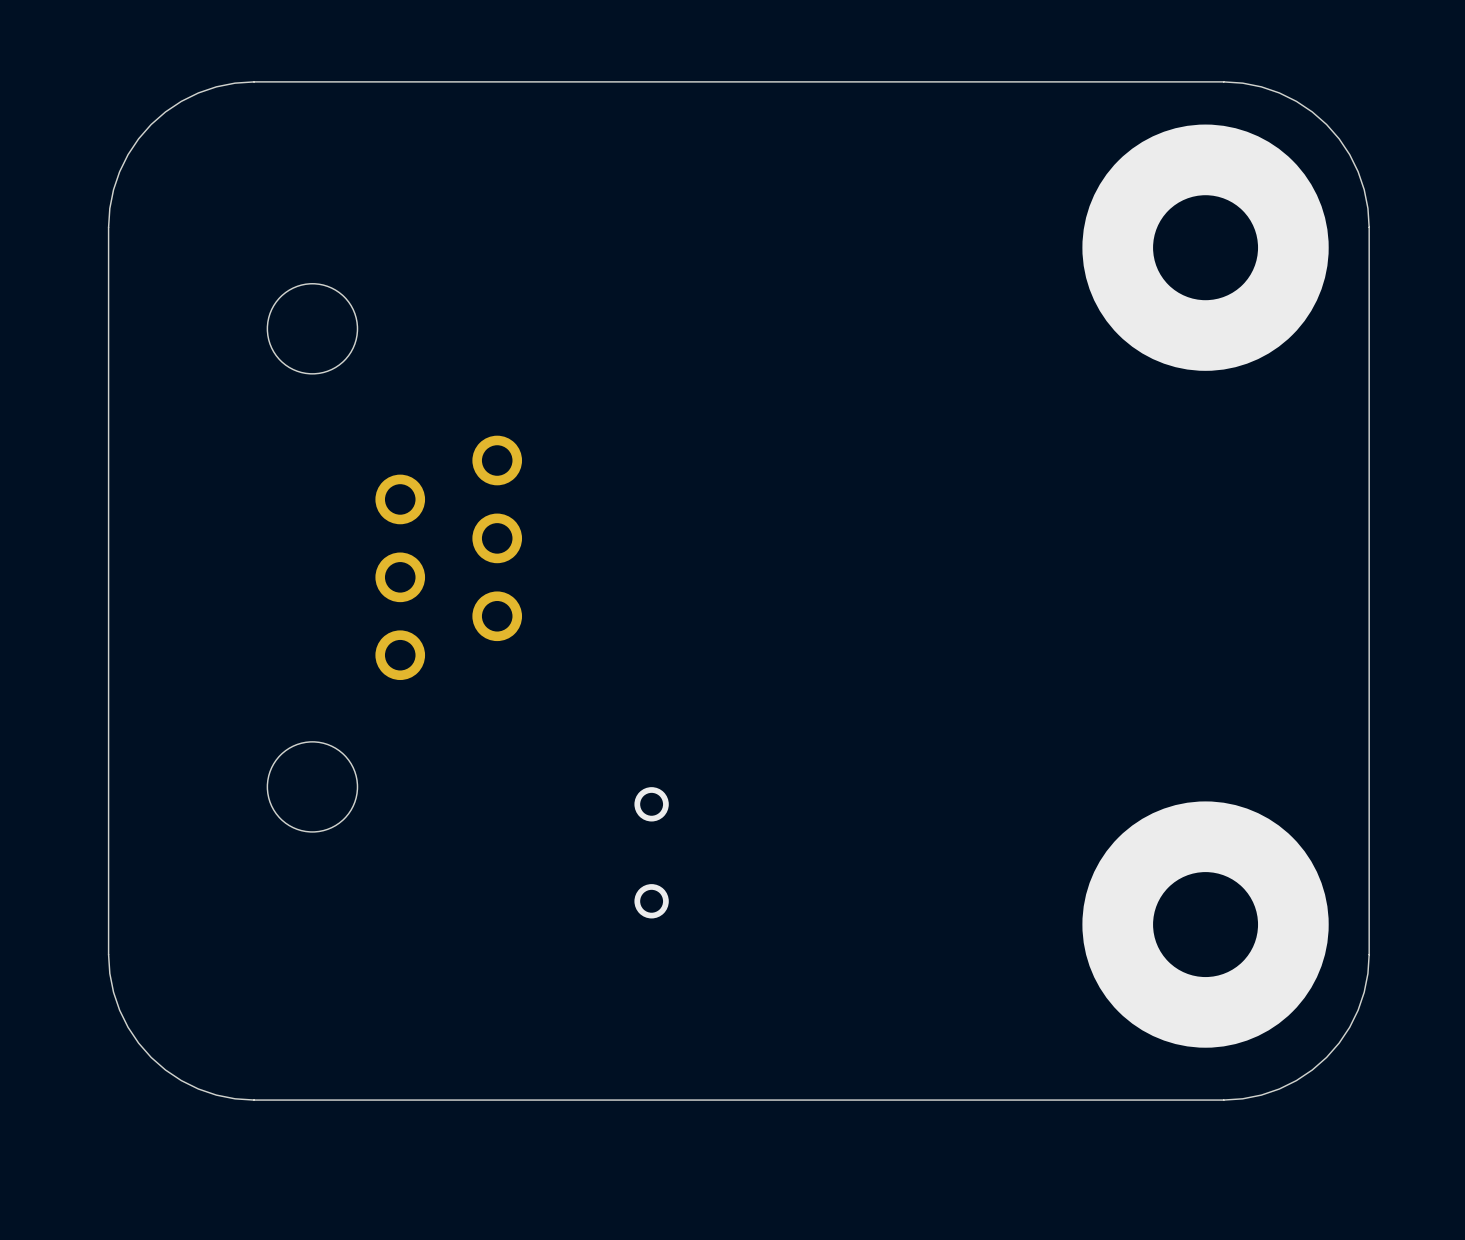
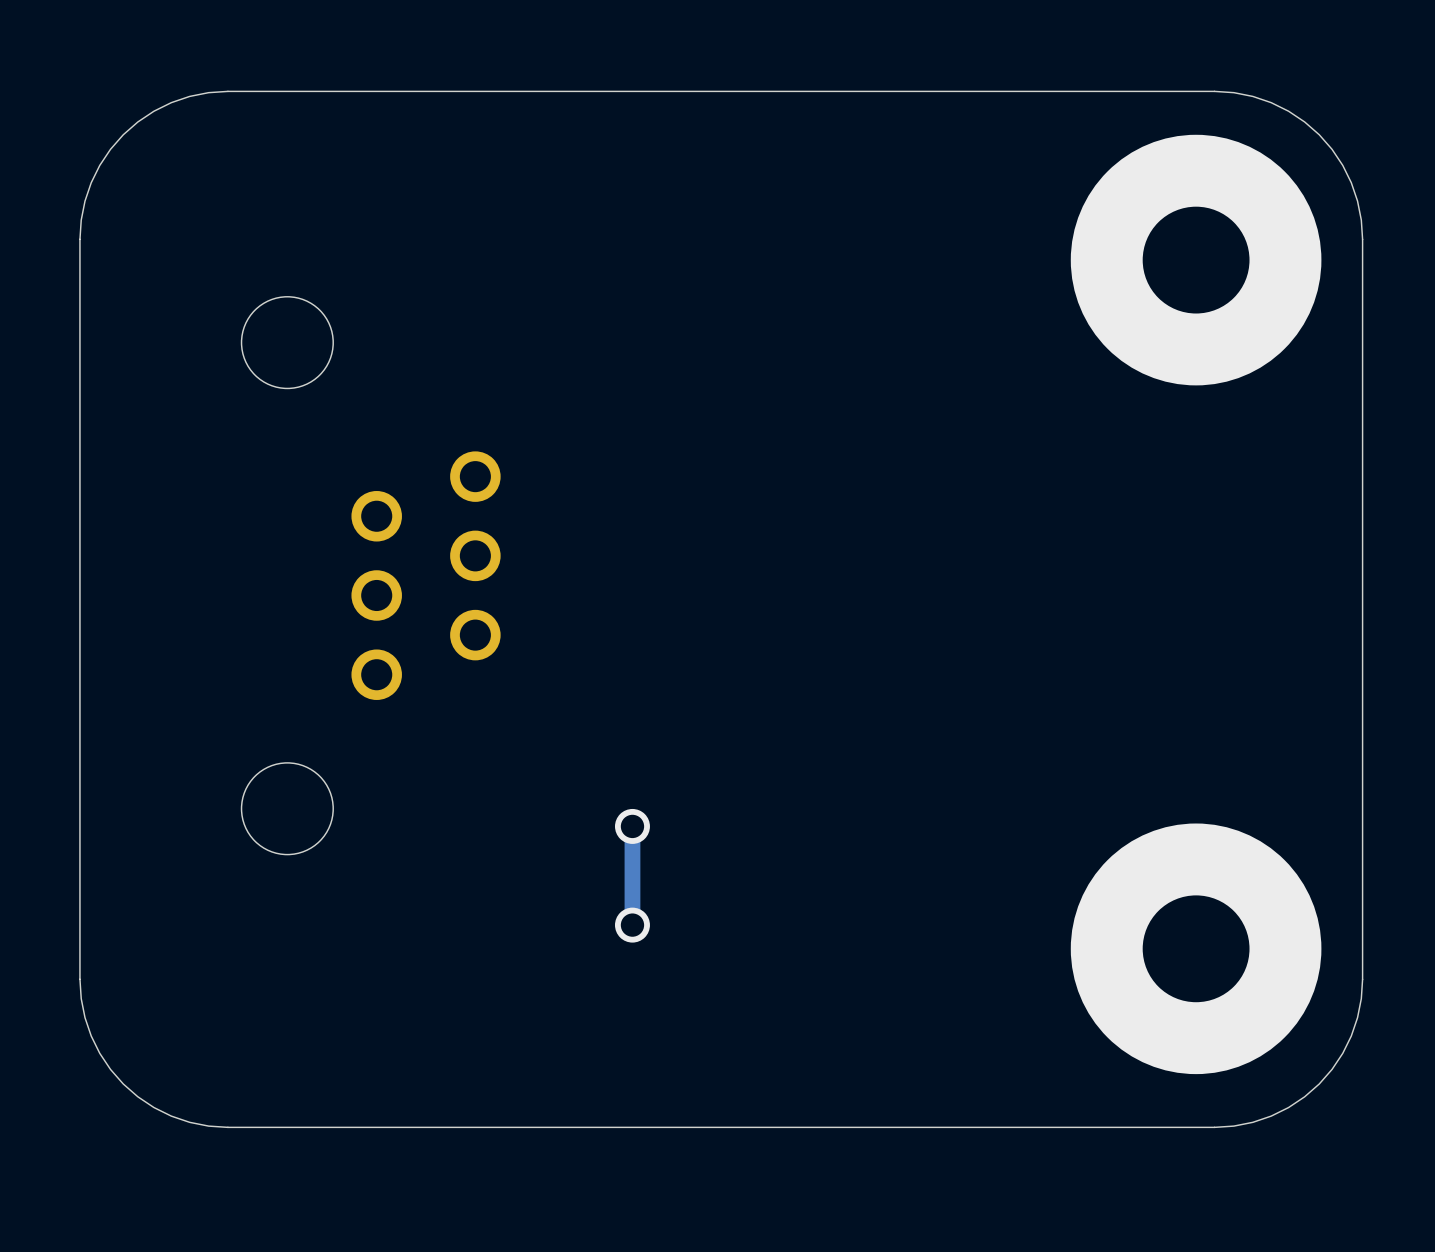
track: none -> (632, 826) (632, 925)

